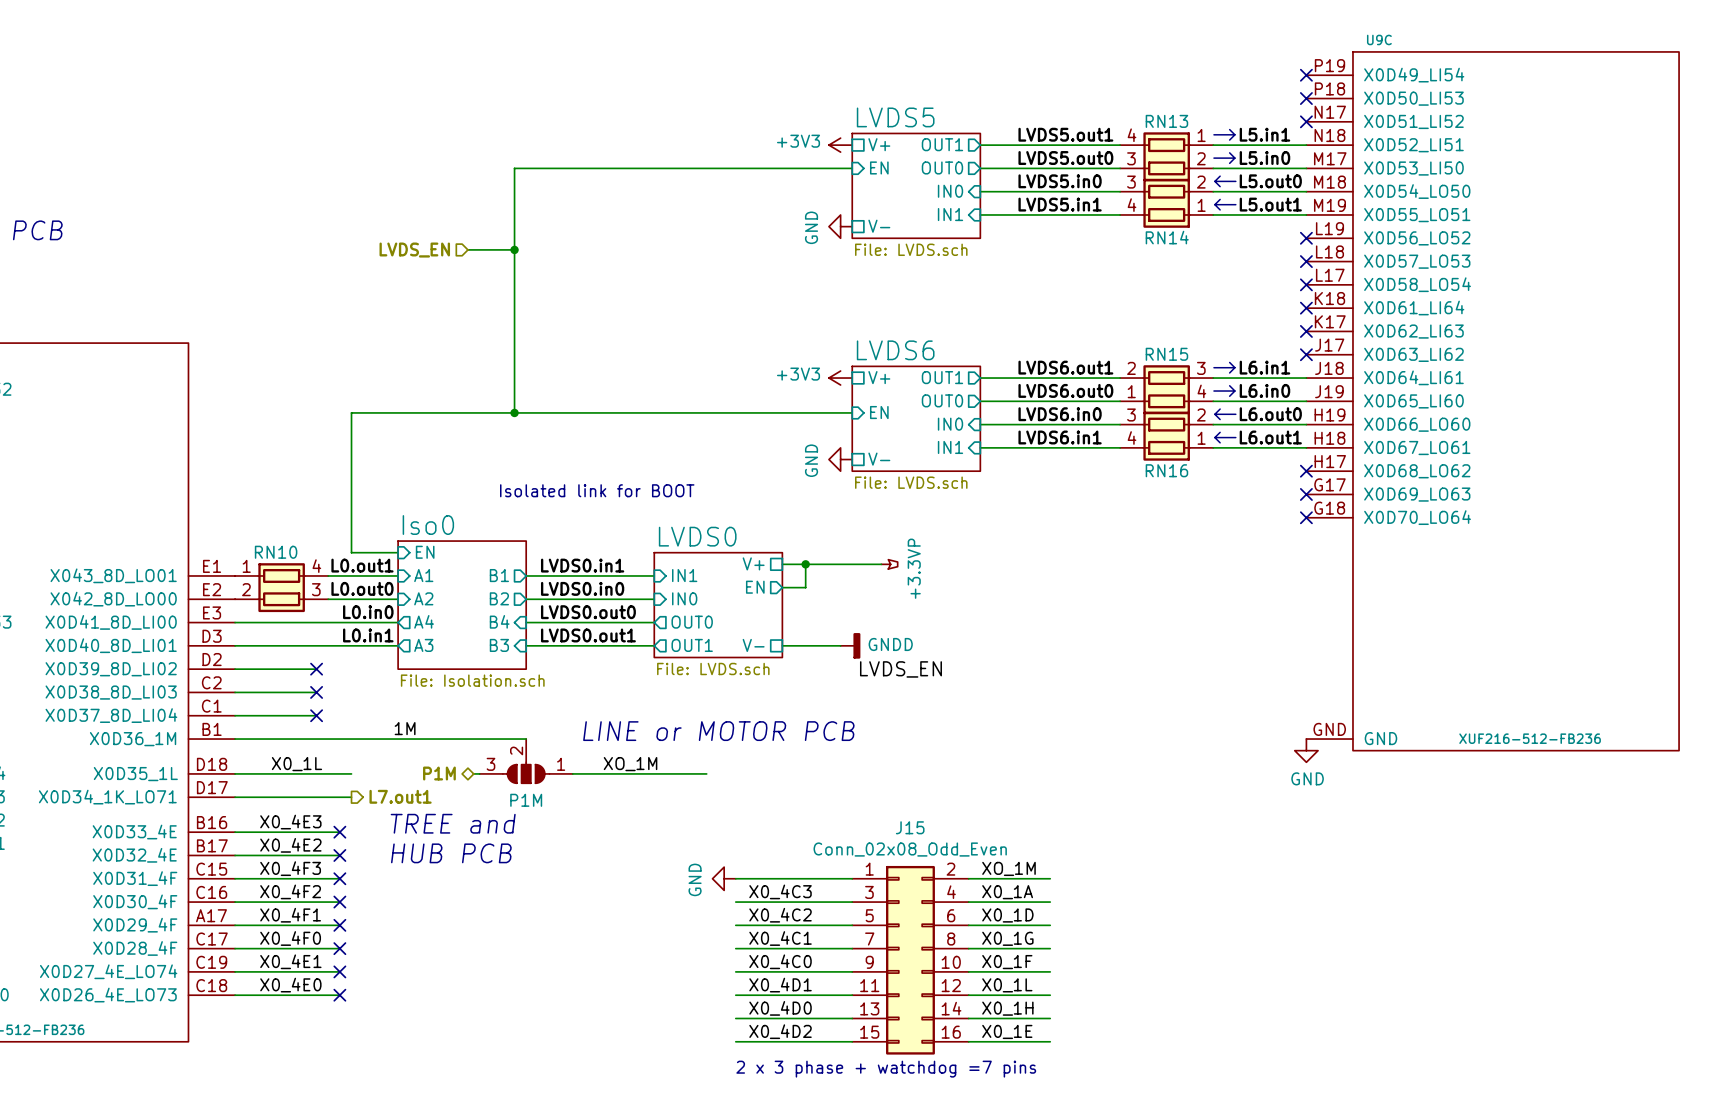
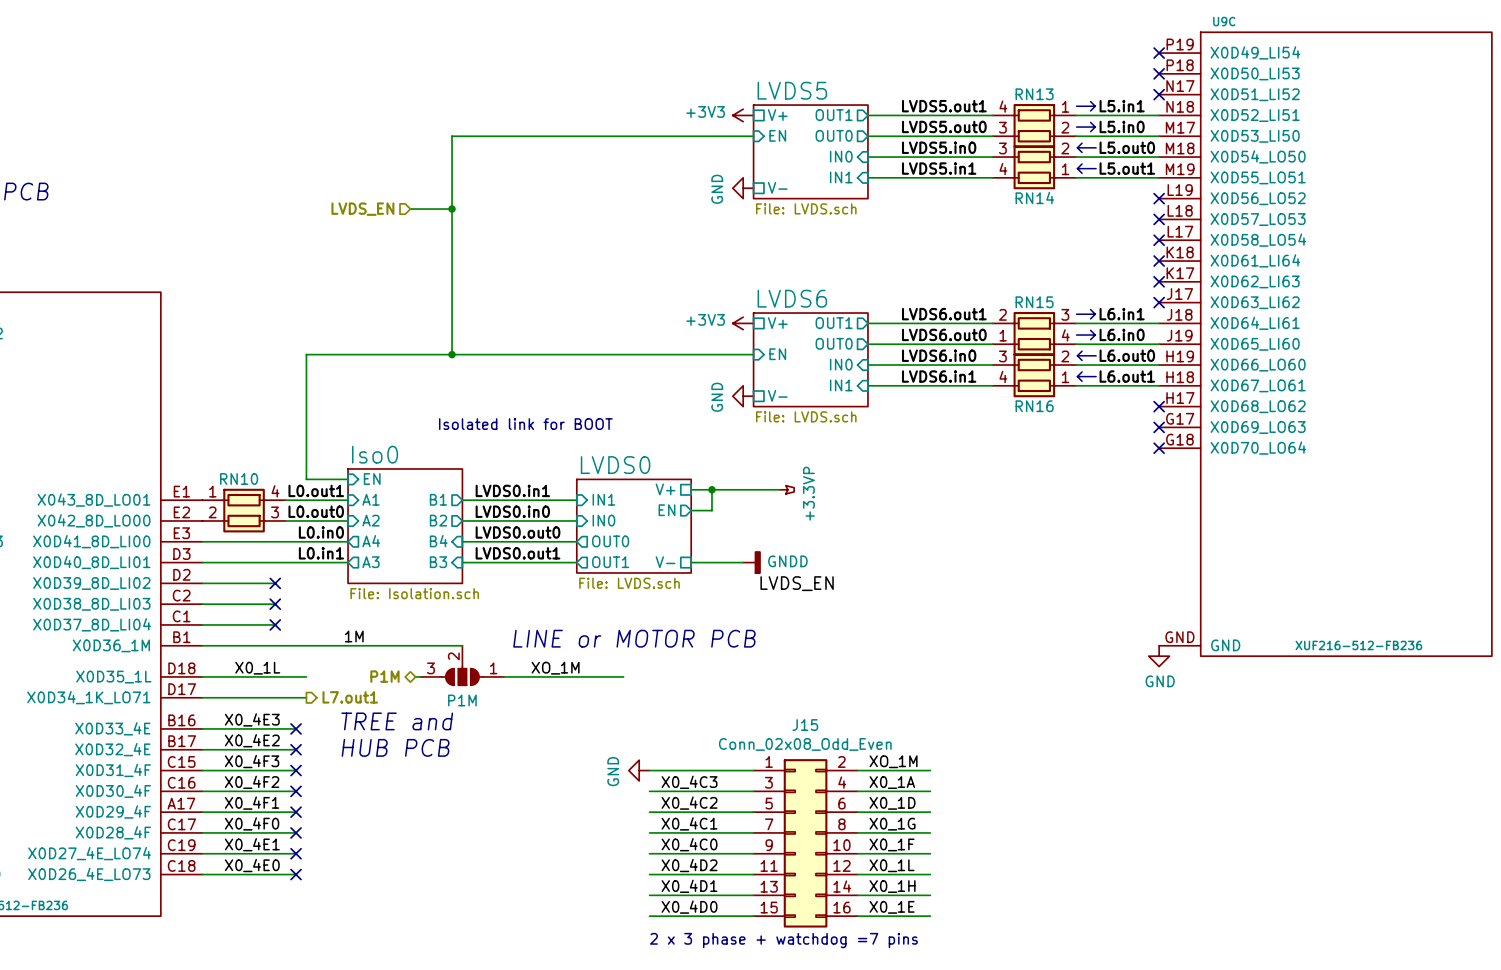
label: X0_4D1 (780, 985) -> X0_4D2 (689, 865)
label: X0_4D0 (780, 1008) -> X0_4D1 (689, 886)
label: X0_4D2 (780, 1031) -> X0_4D0 (689, 907)

